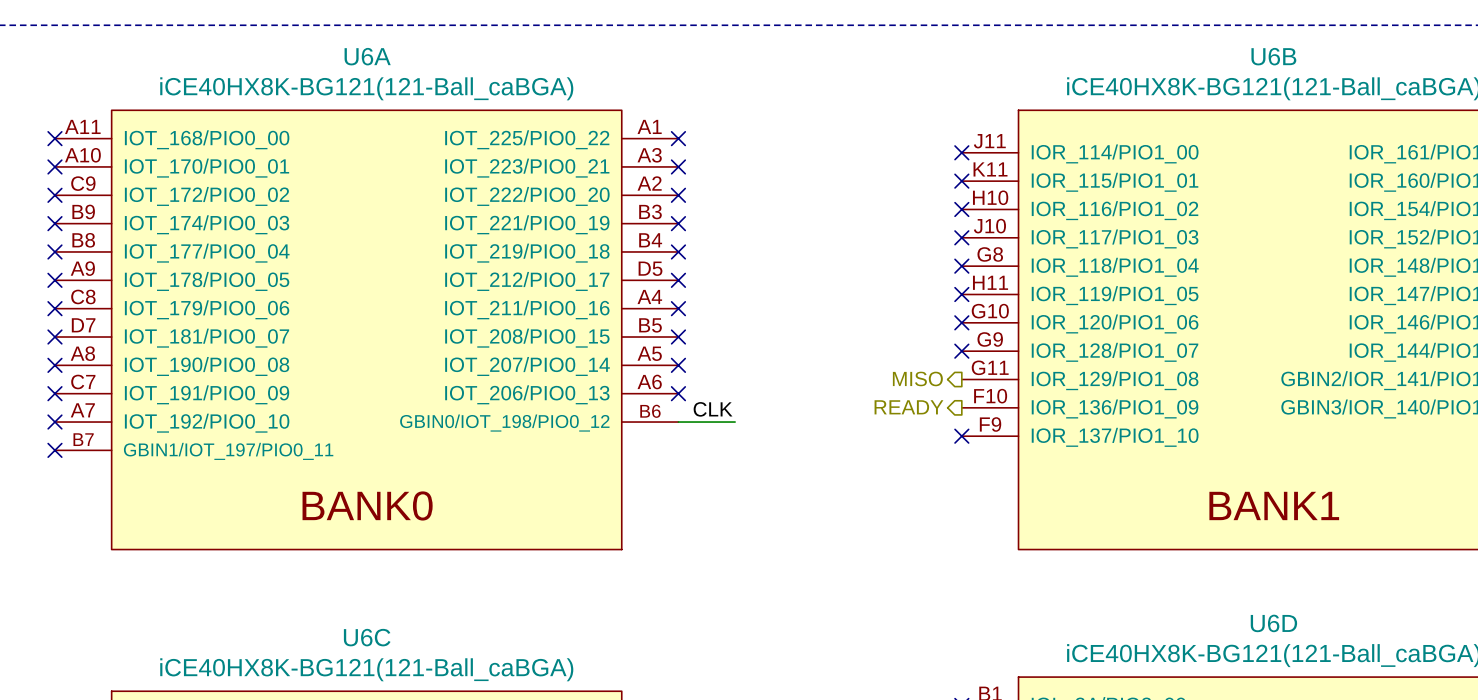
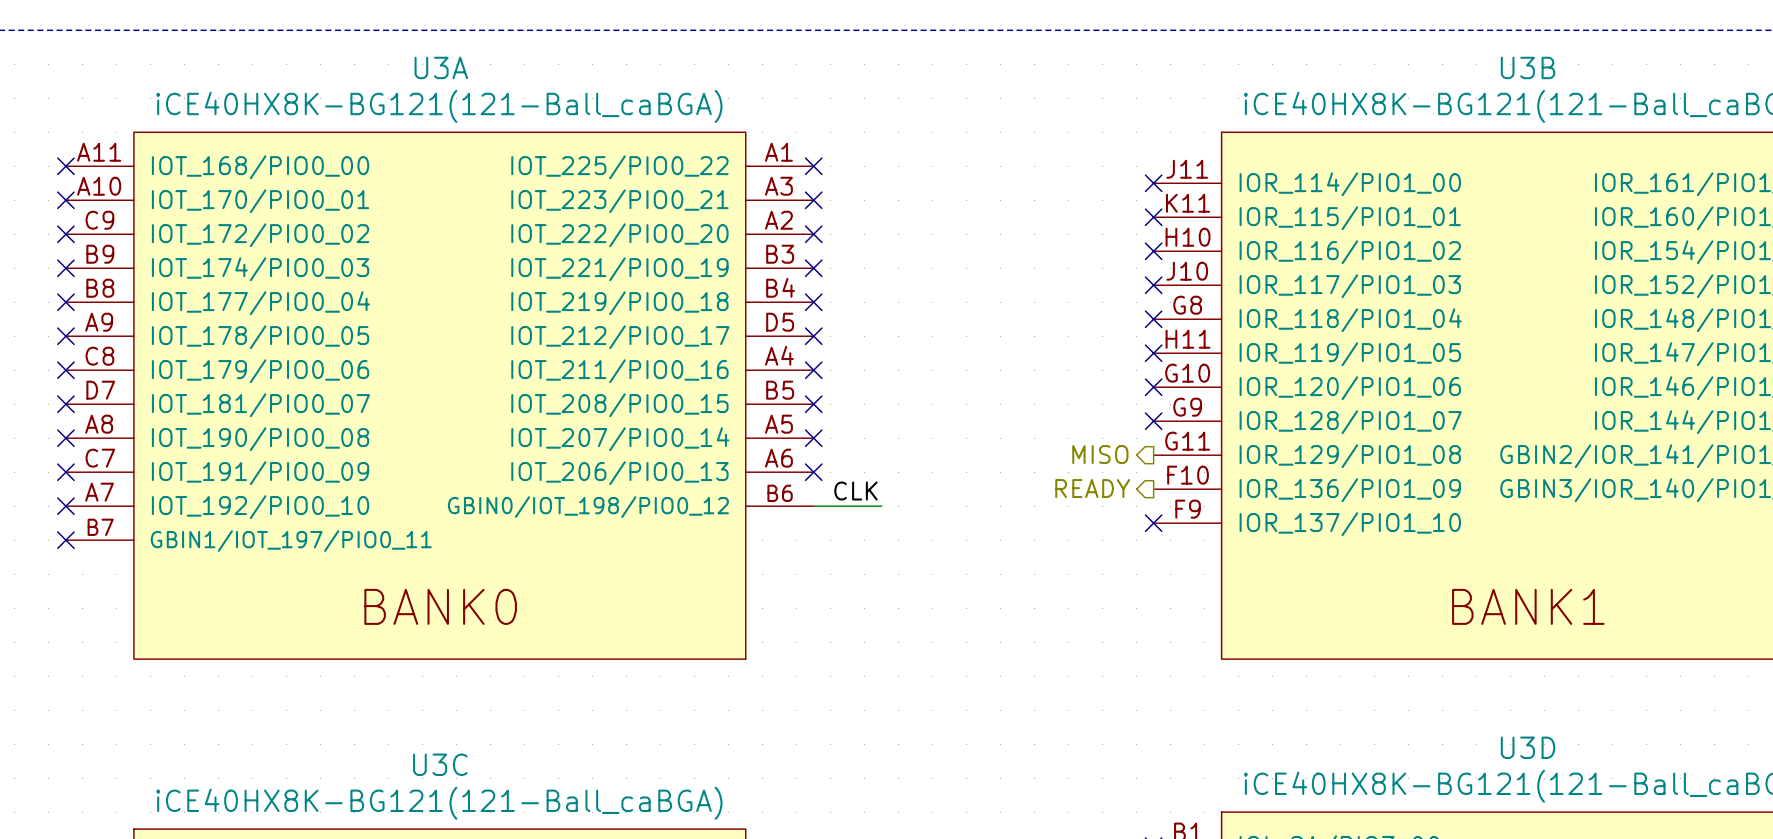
U6A name: U6A (367, 56) -> U3A (441, 67)
U6B name: U6B (1273, 56) -> U3B (1528, 67)
U6D name: U6D (1273, 623) -> U3D (1528, 747)
U6C name: U6C (367, 637) -> U3C (440, 764)

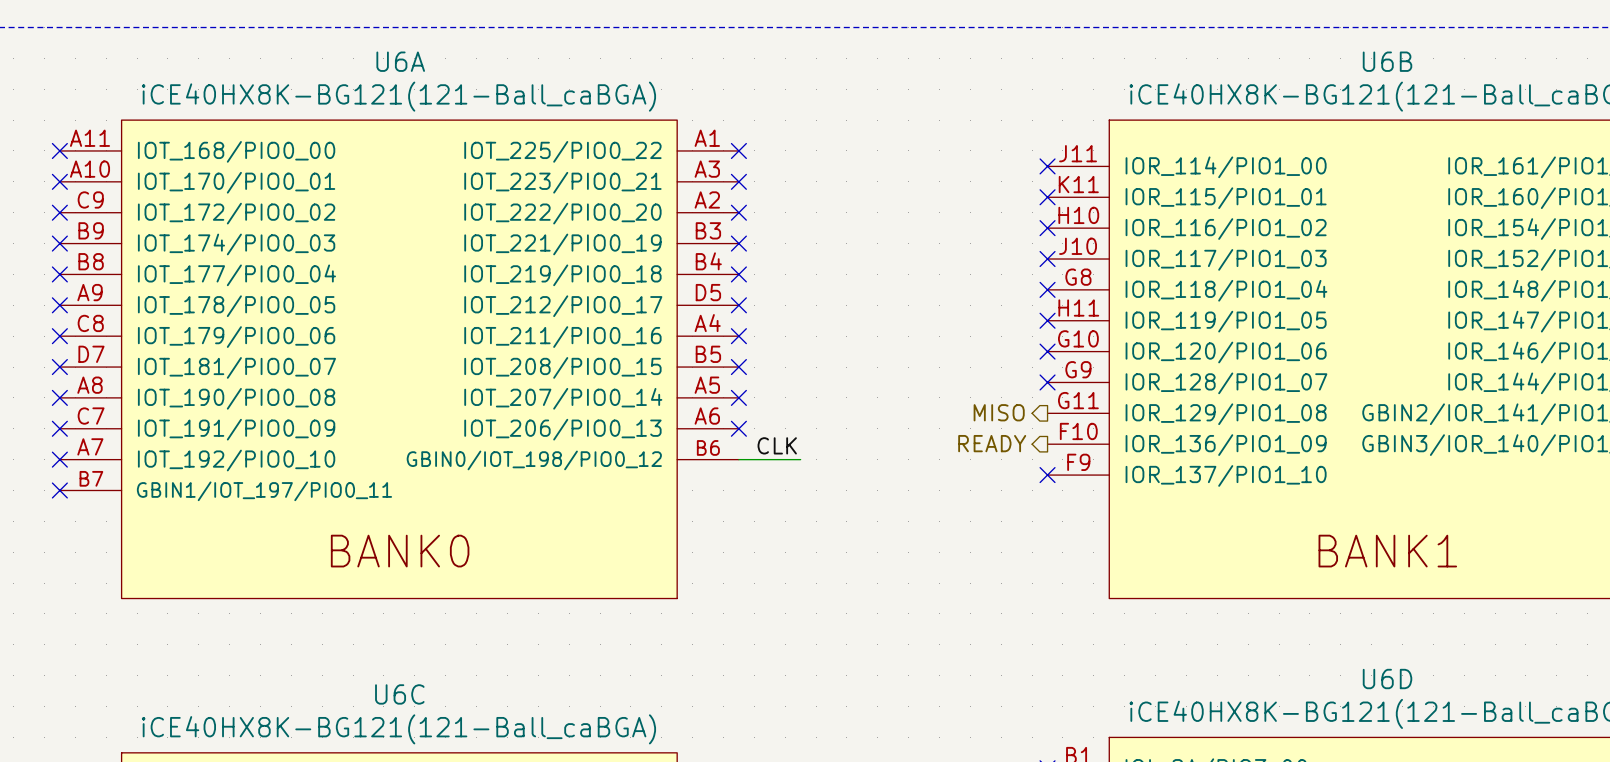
U3A name: U3A (441, 67) -> U6A (400, 61)
U3B name: U3B (1528, 67) -> U6B (1387, 61)
U3D name: U3D (1528, 747) -> U6D (1387, 679)
U3C name: U3C (440, 764) -> U6C (399, 694)

